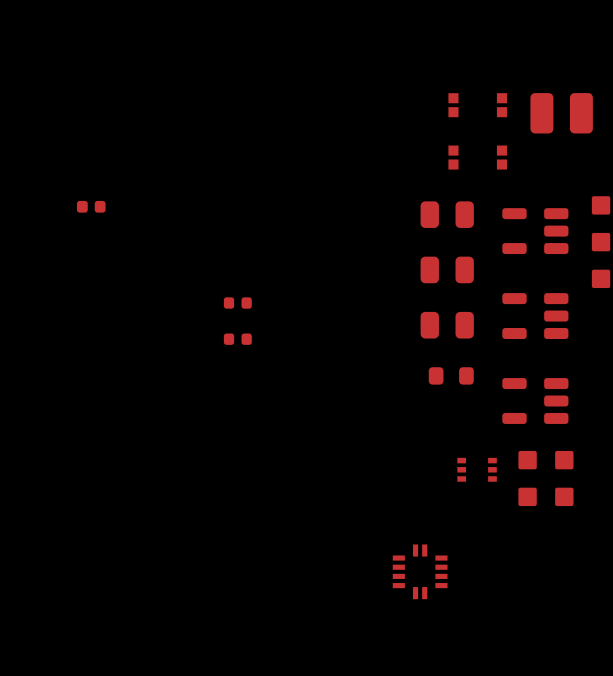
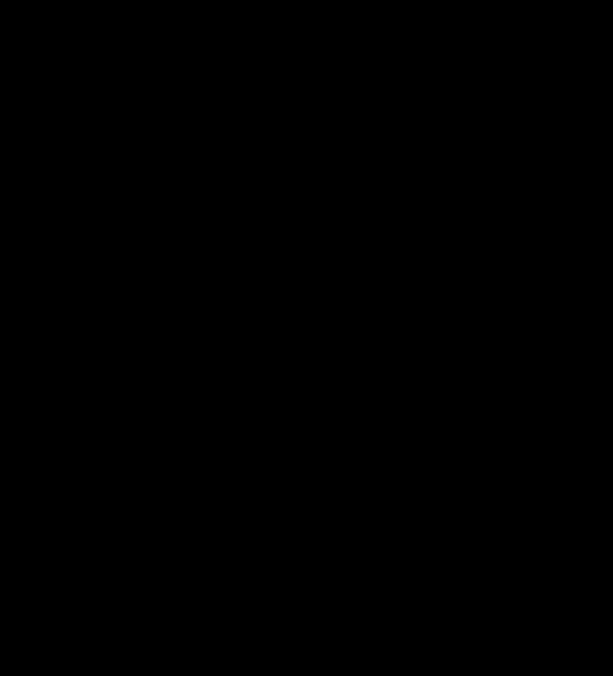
part: (477, 105) -> none
part: (561, 113) -> none
part: (477, 157) -> none
part: (601, 205) -> none
part: (91, 206) -> none
part: (447, 214) -> none
part: (535, 231) -> none
part: (601, 242) -> none
part: (447, 269) -> none
part: (601, 278) -> none
part: (237, 303) -> none
part: (535, 316) -> none
part: (447, 325) -> none
part: (237, 339) -> none
part: (451, 375) -> none
part: (535, 401) -> none
part: (545, 460) -> none
part: (477, 469) -> none
part: (545, 496) -> none
part: (420, 571) -> none

